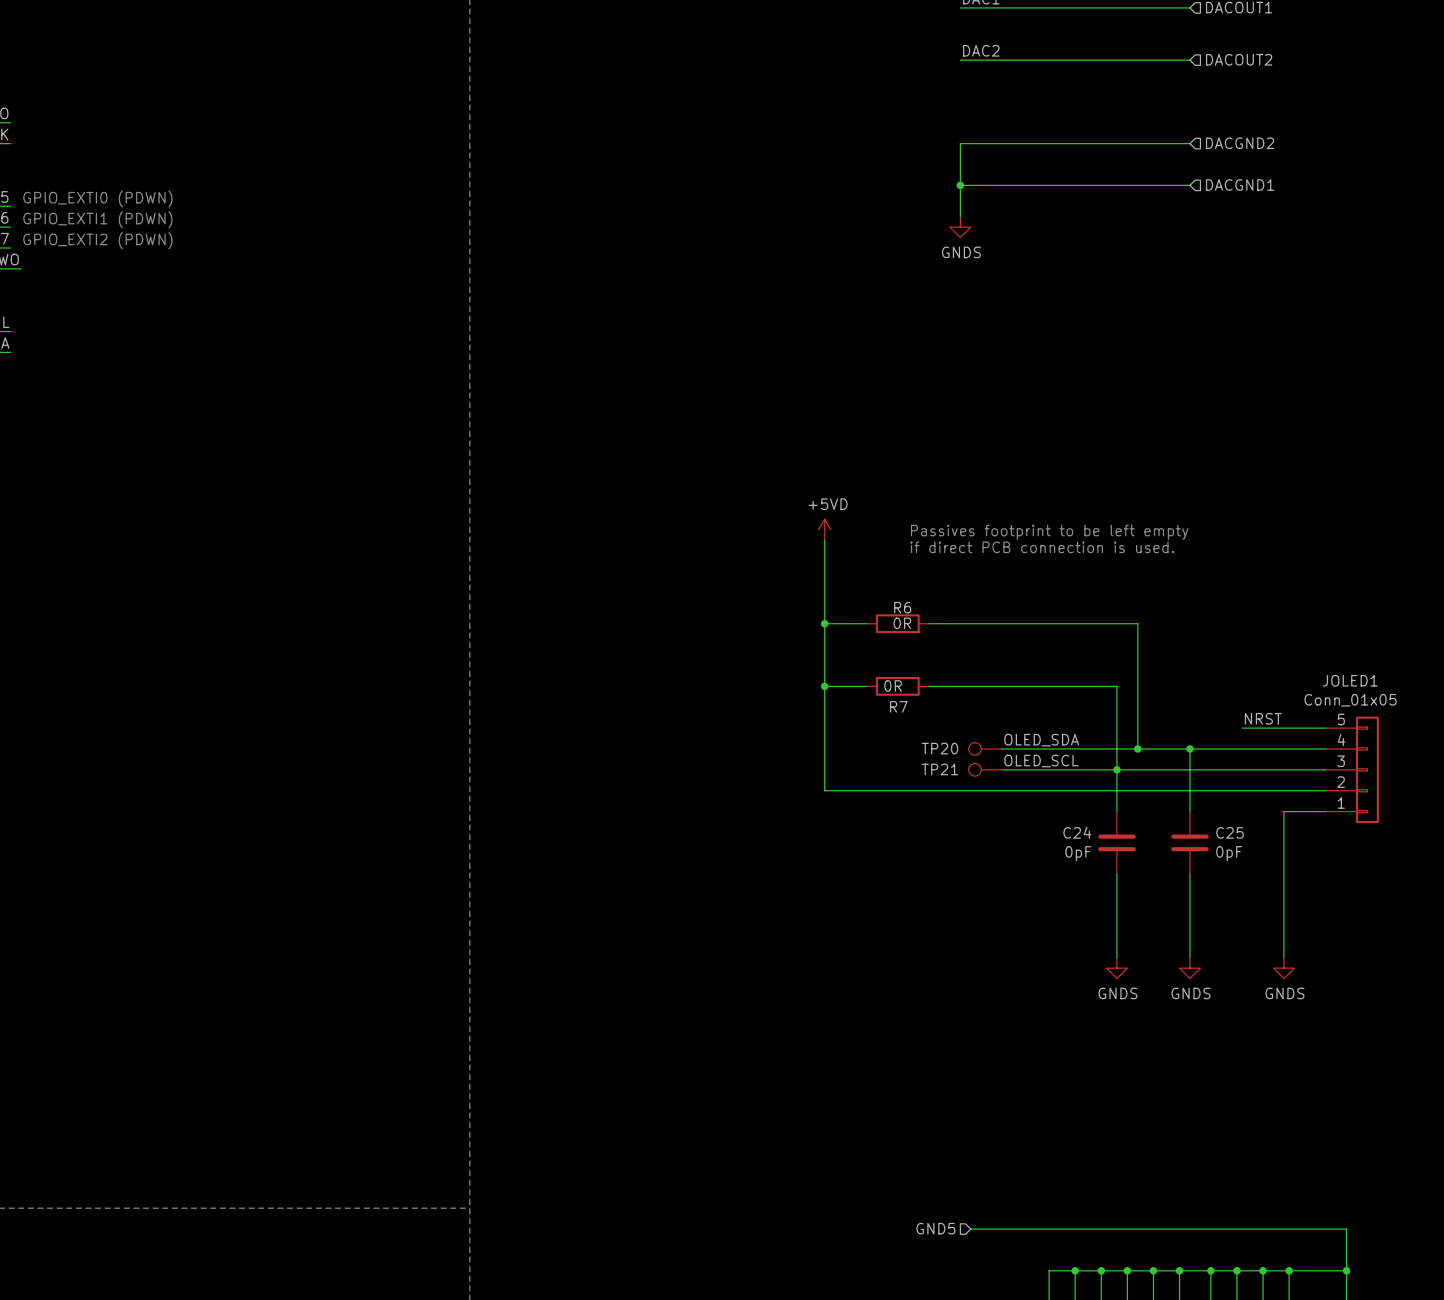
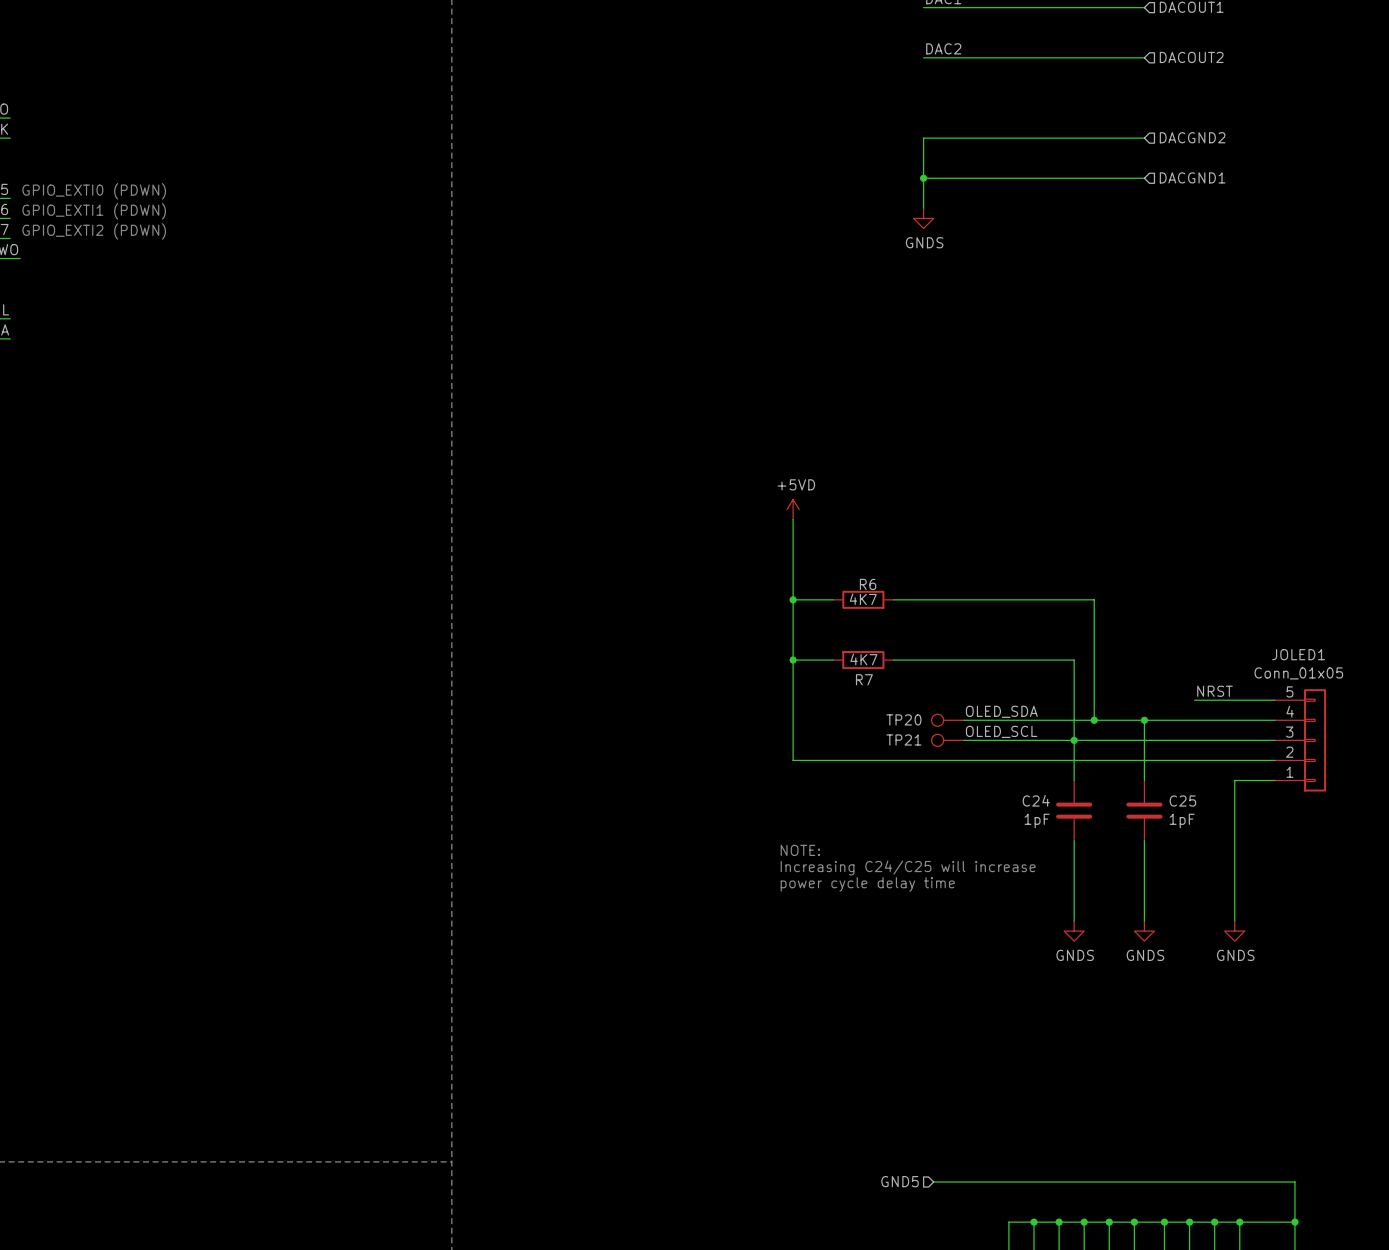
text: Passives footprint to be left empty (1049, 532) -> none
text: if direct PCB connection is used. (1042, 547) -> none
R6 value: 0R (902, 623) -> 4K7 (863, 599)
R7 value: 0R (893, 685) -> 4K7 (863, 659)
C24 value: 0pF (1078, 853) -> 1pF (1037, 820)
C25 value: 0pF (1229, 853) -> 1pF (1182, 820)
text: none -> NOTE: (800, 850)
text: none -> Increasing C24/C25 will increase (908, 867)
text: none -> power cycle delay time (867, 884)

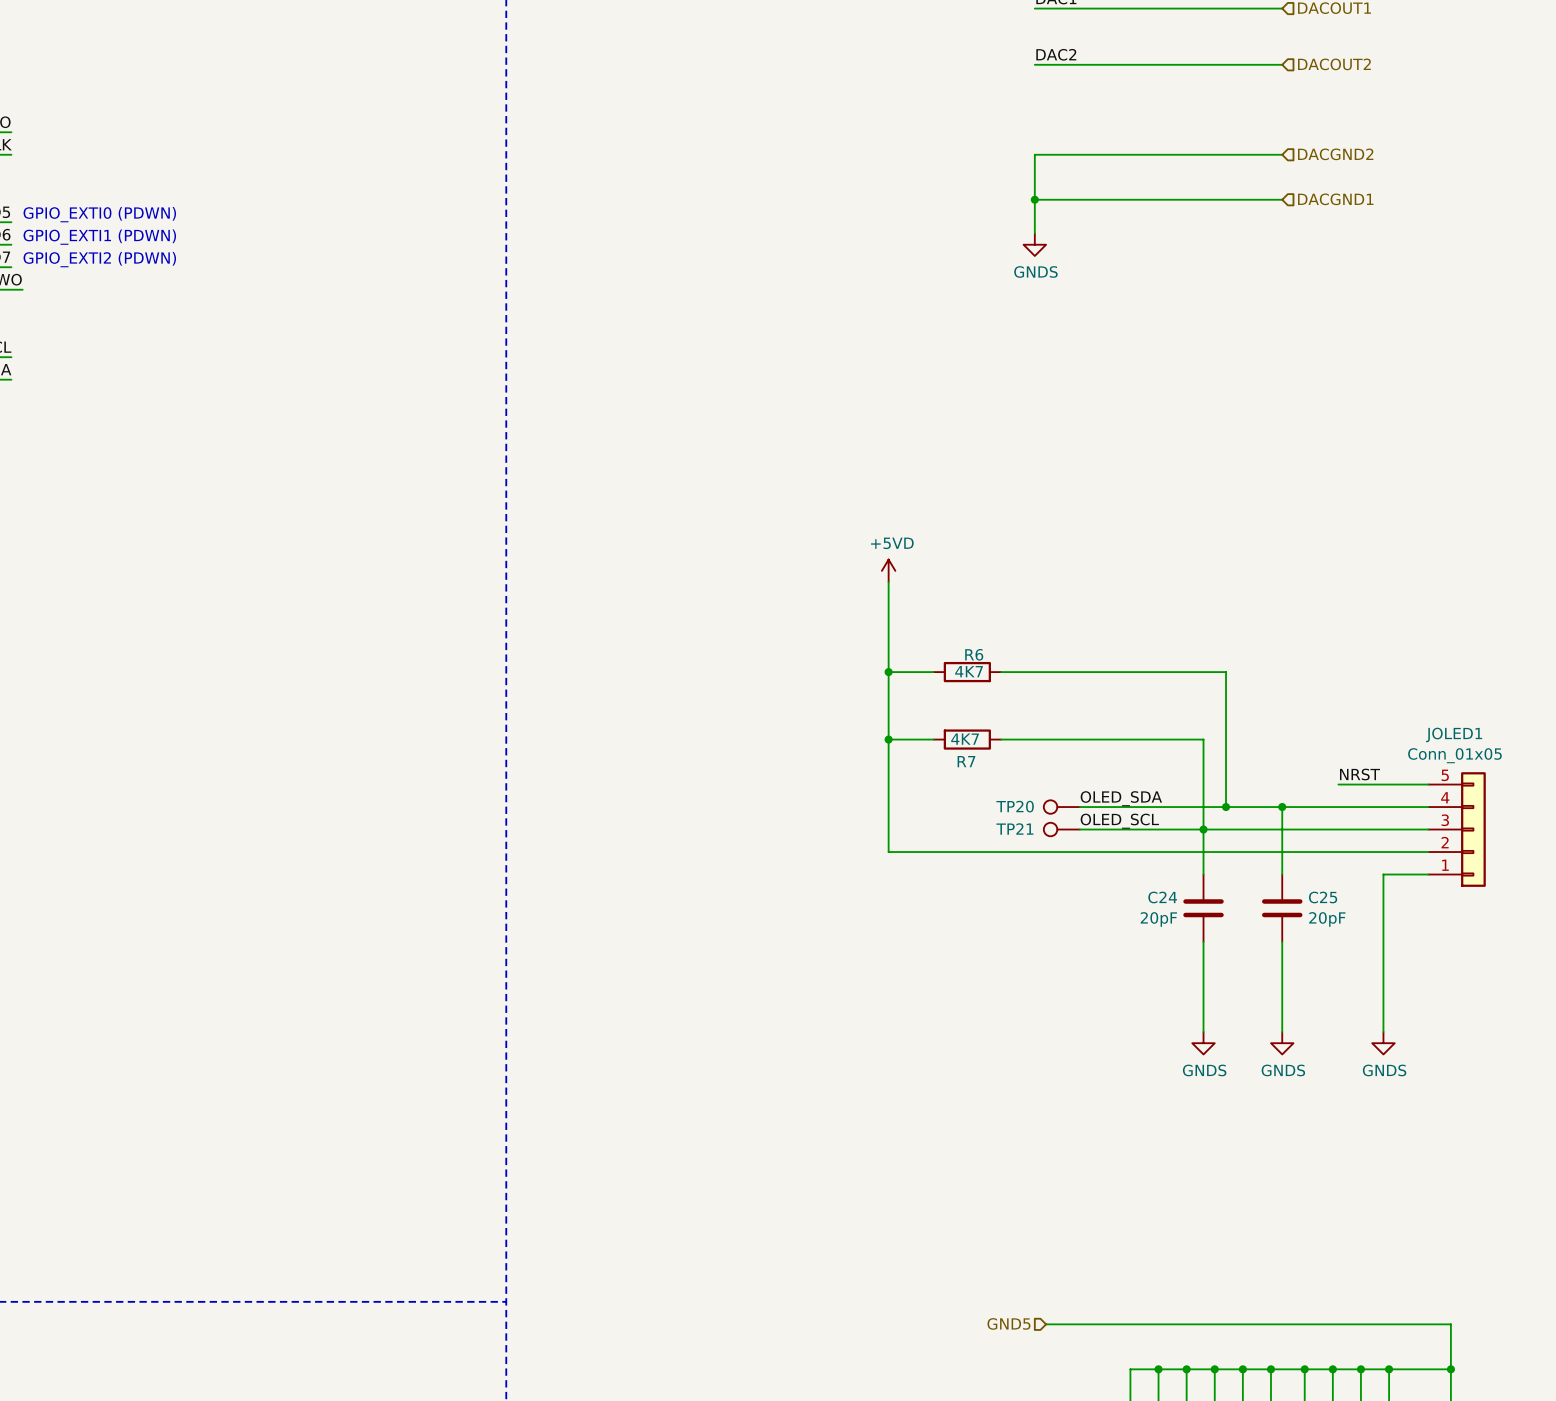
C24 value: 1pF (1037, 820) -> 20pF (1158, 919)
C25 value: 1pF (1182, 820) -> 20pF (1327, 919)
text: NOTE: (800, 850) -> none
text: Increasing C24/C25 will increase (908, 867) -> none
text: power cycle delay time (867, 884) -> none

